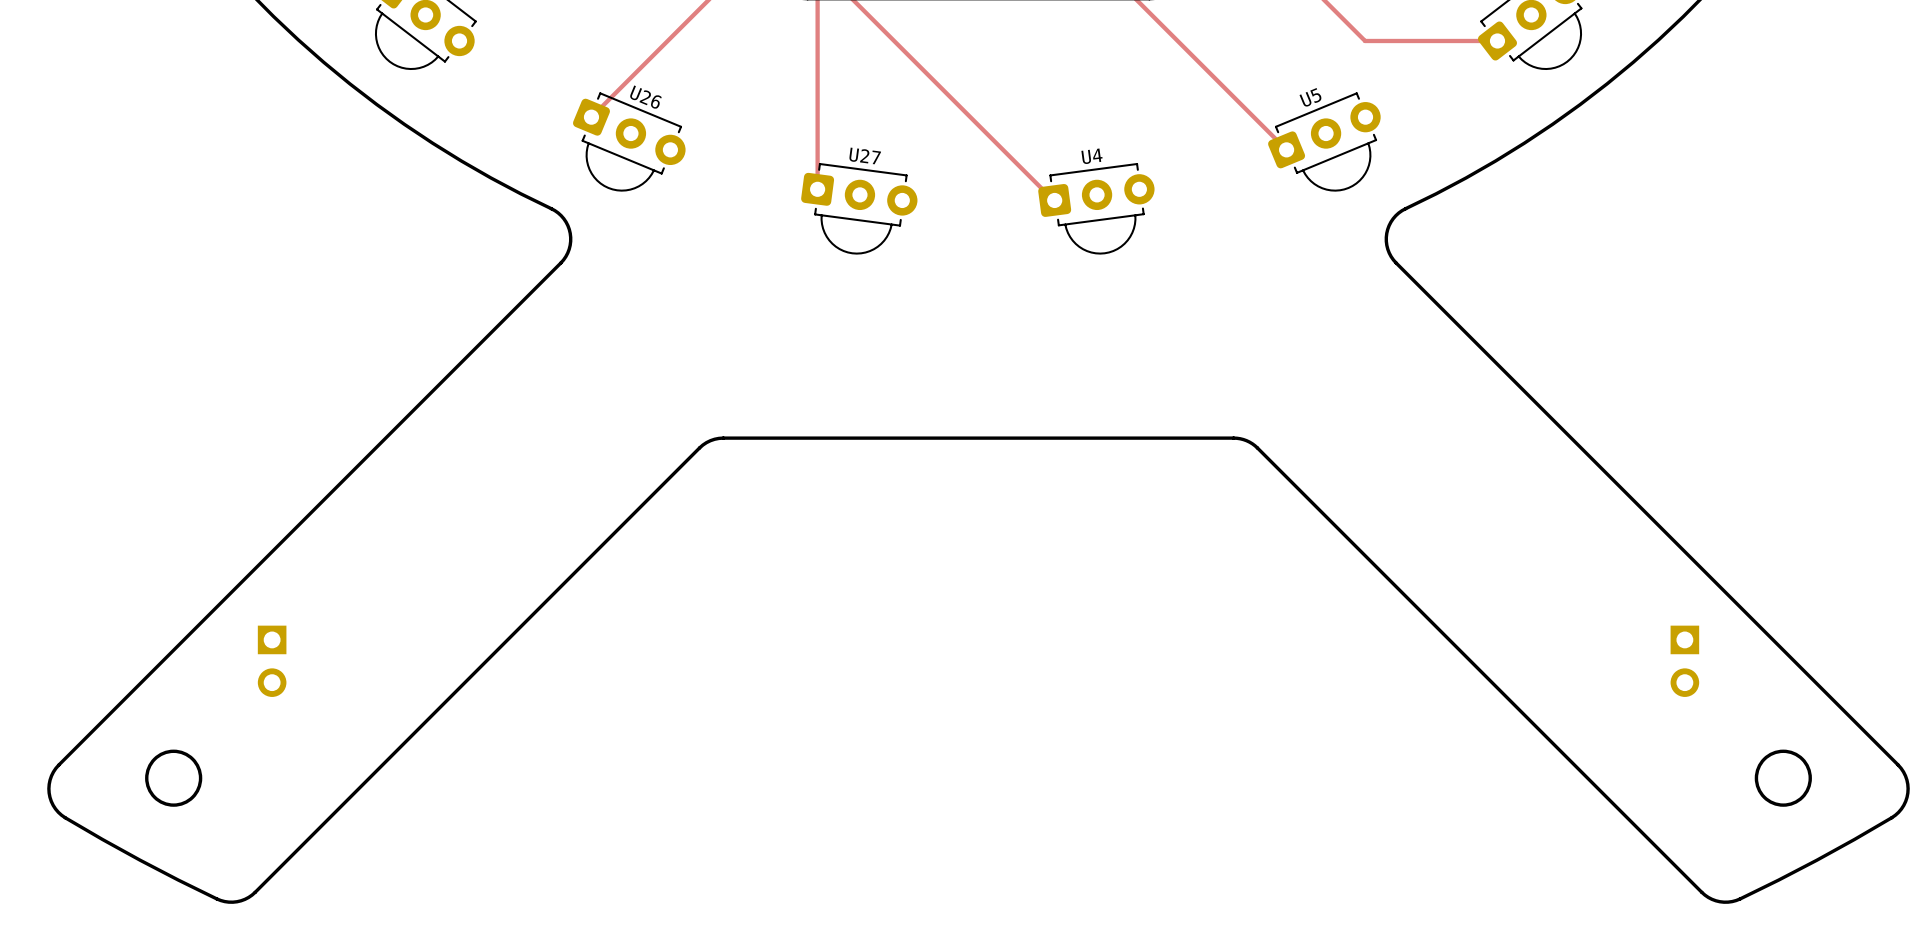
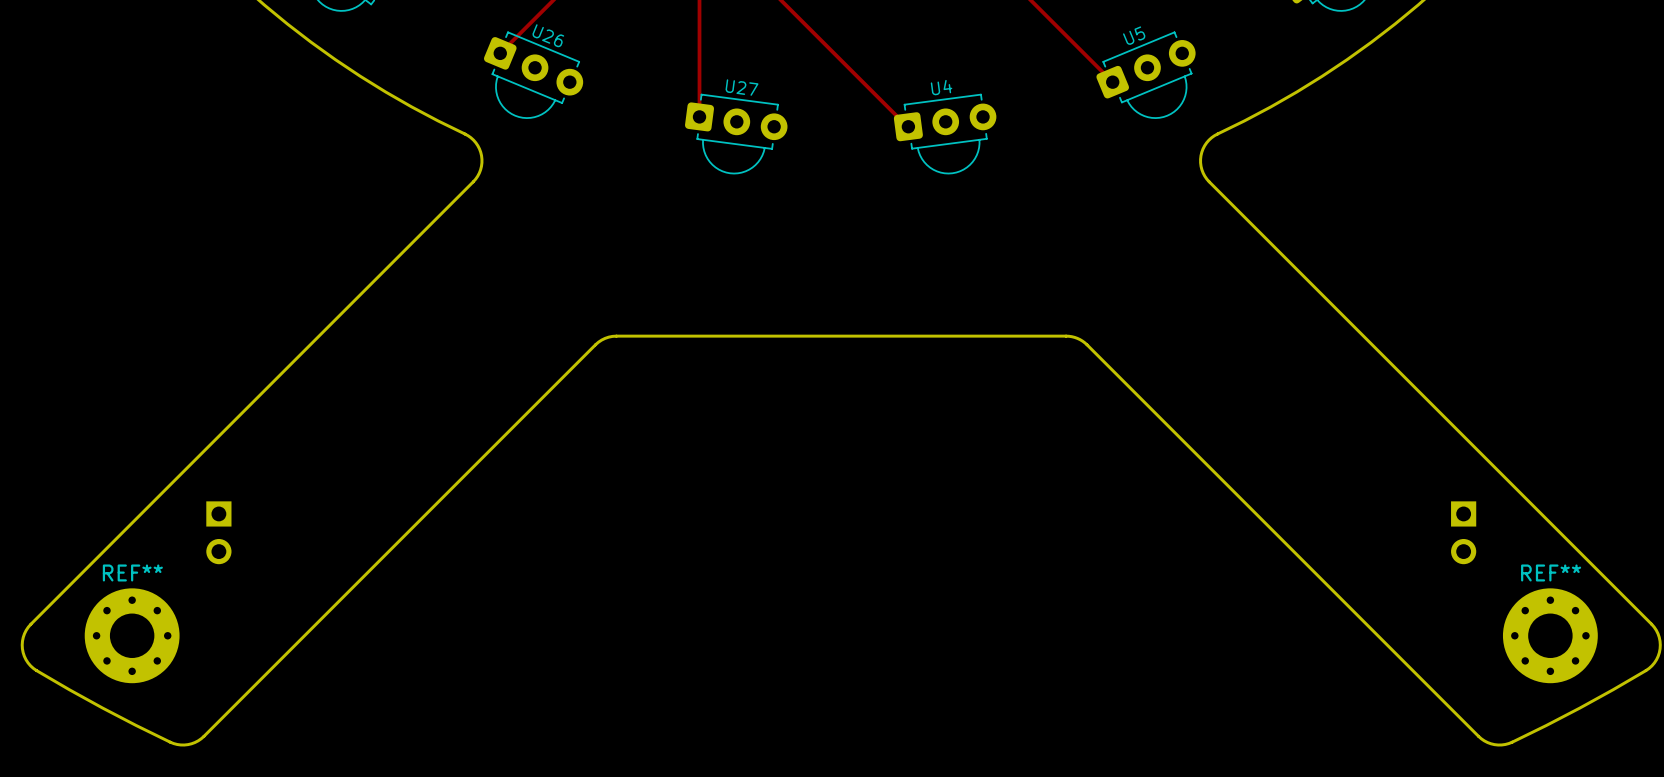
REF**: none -> (132, 635)
REF**: none -> (1550, 635)

